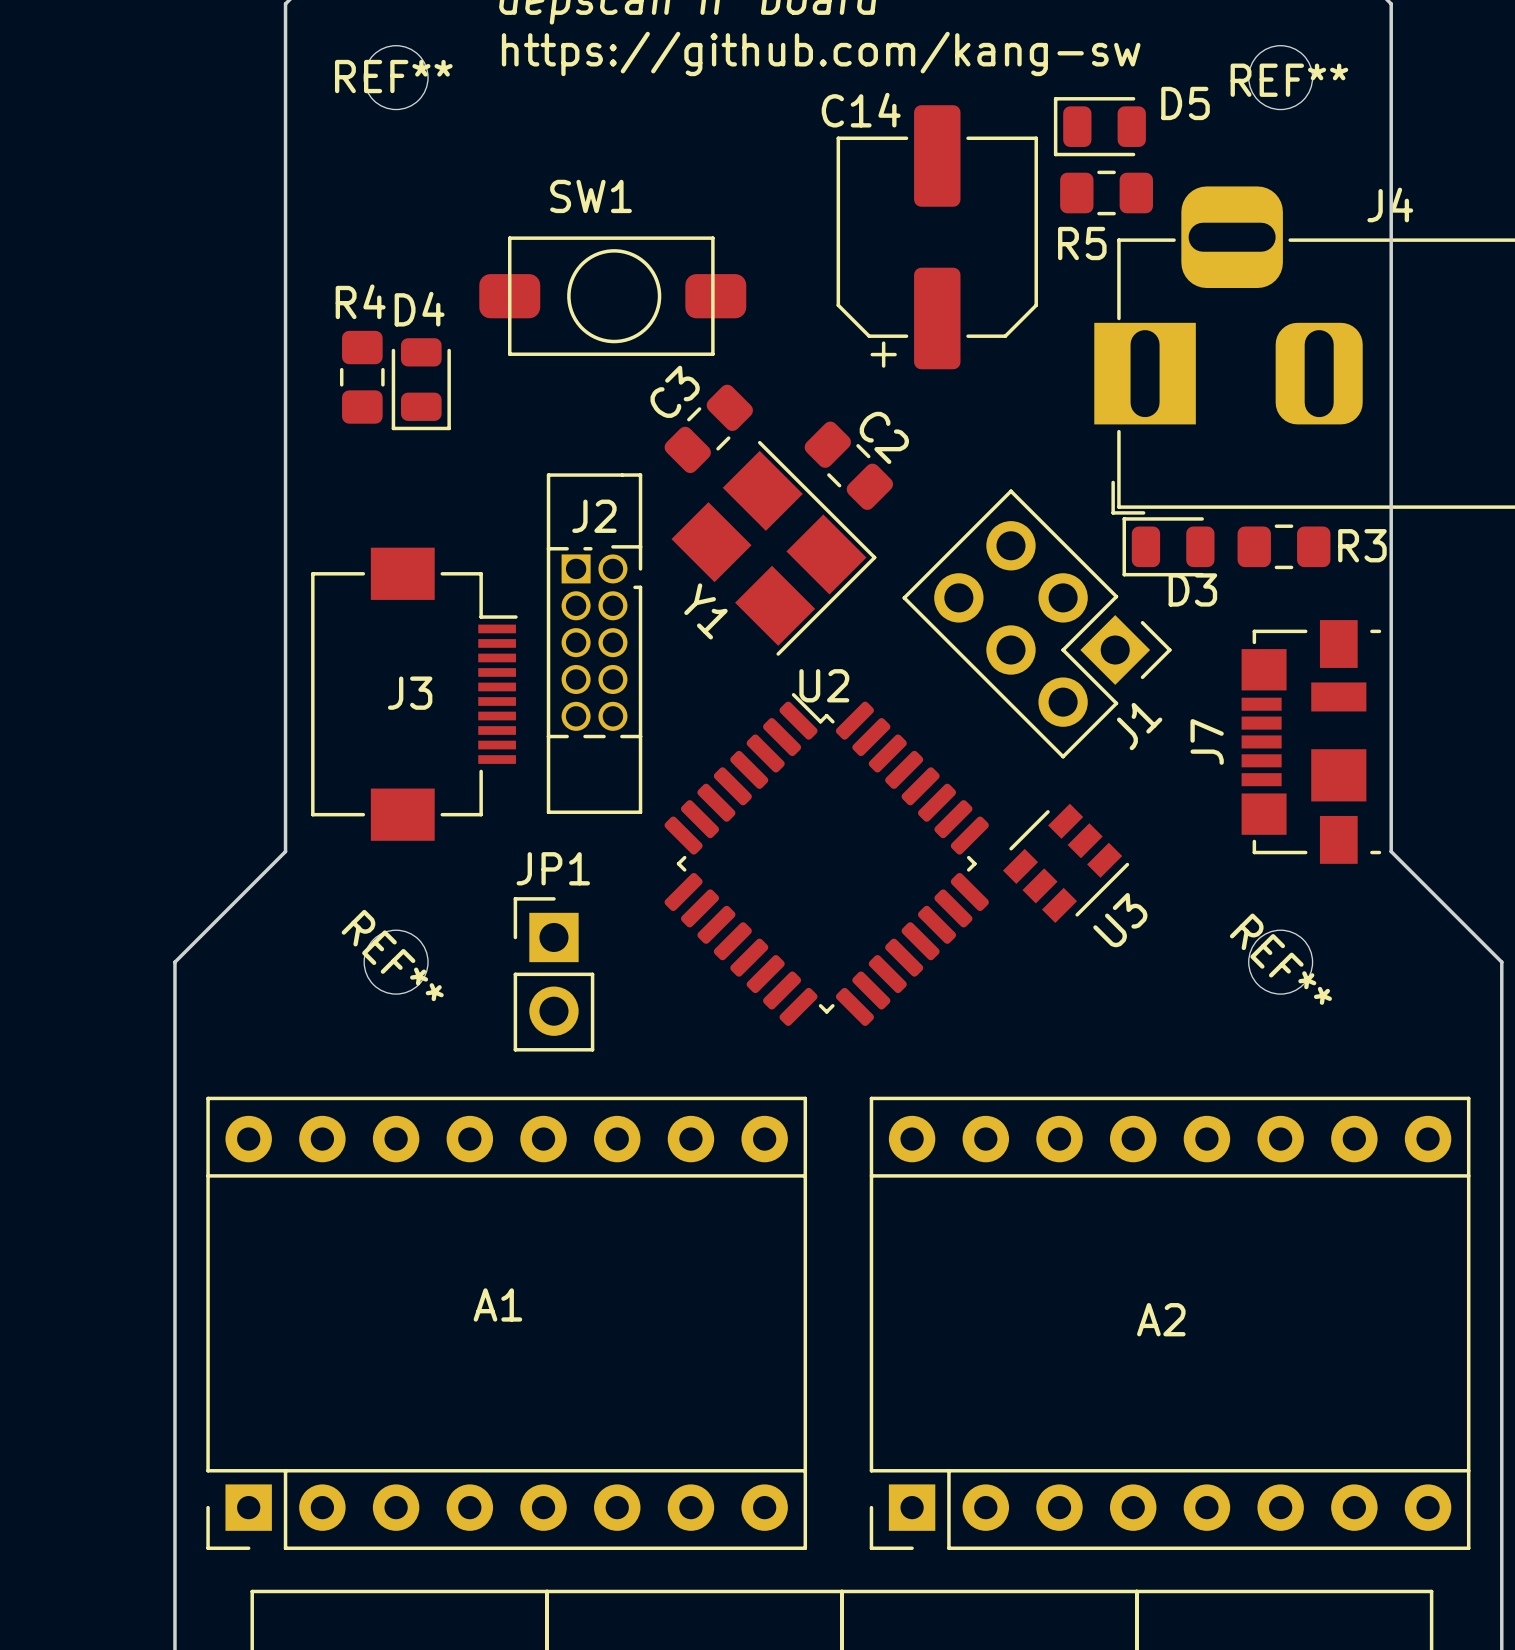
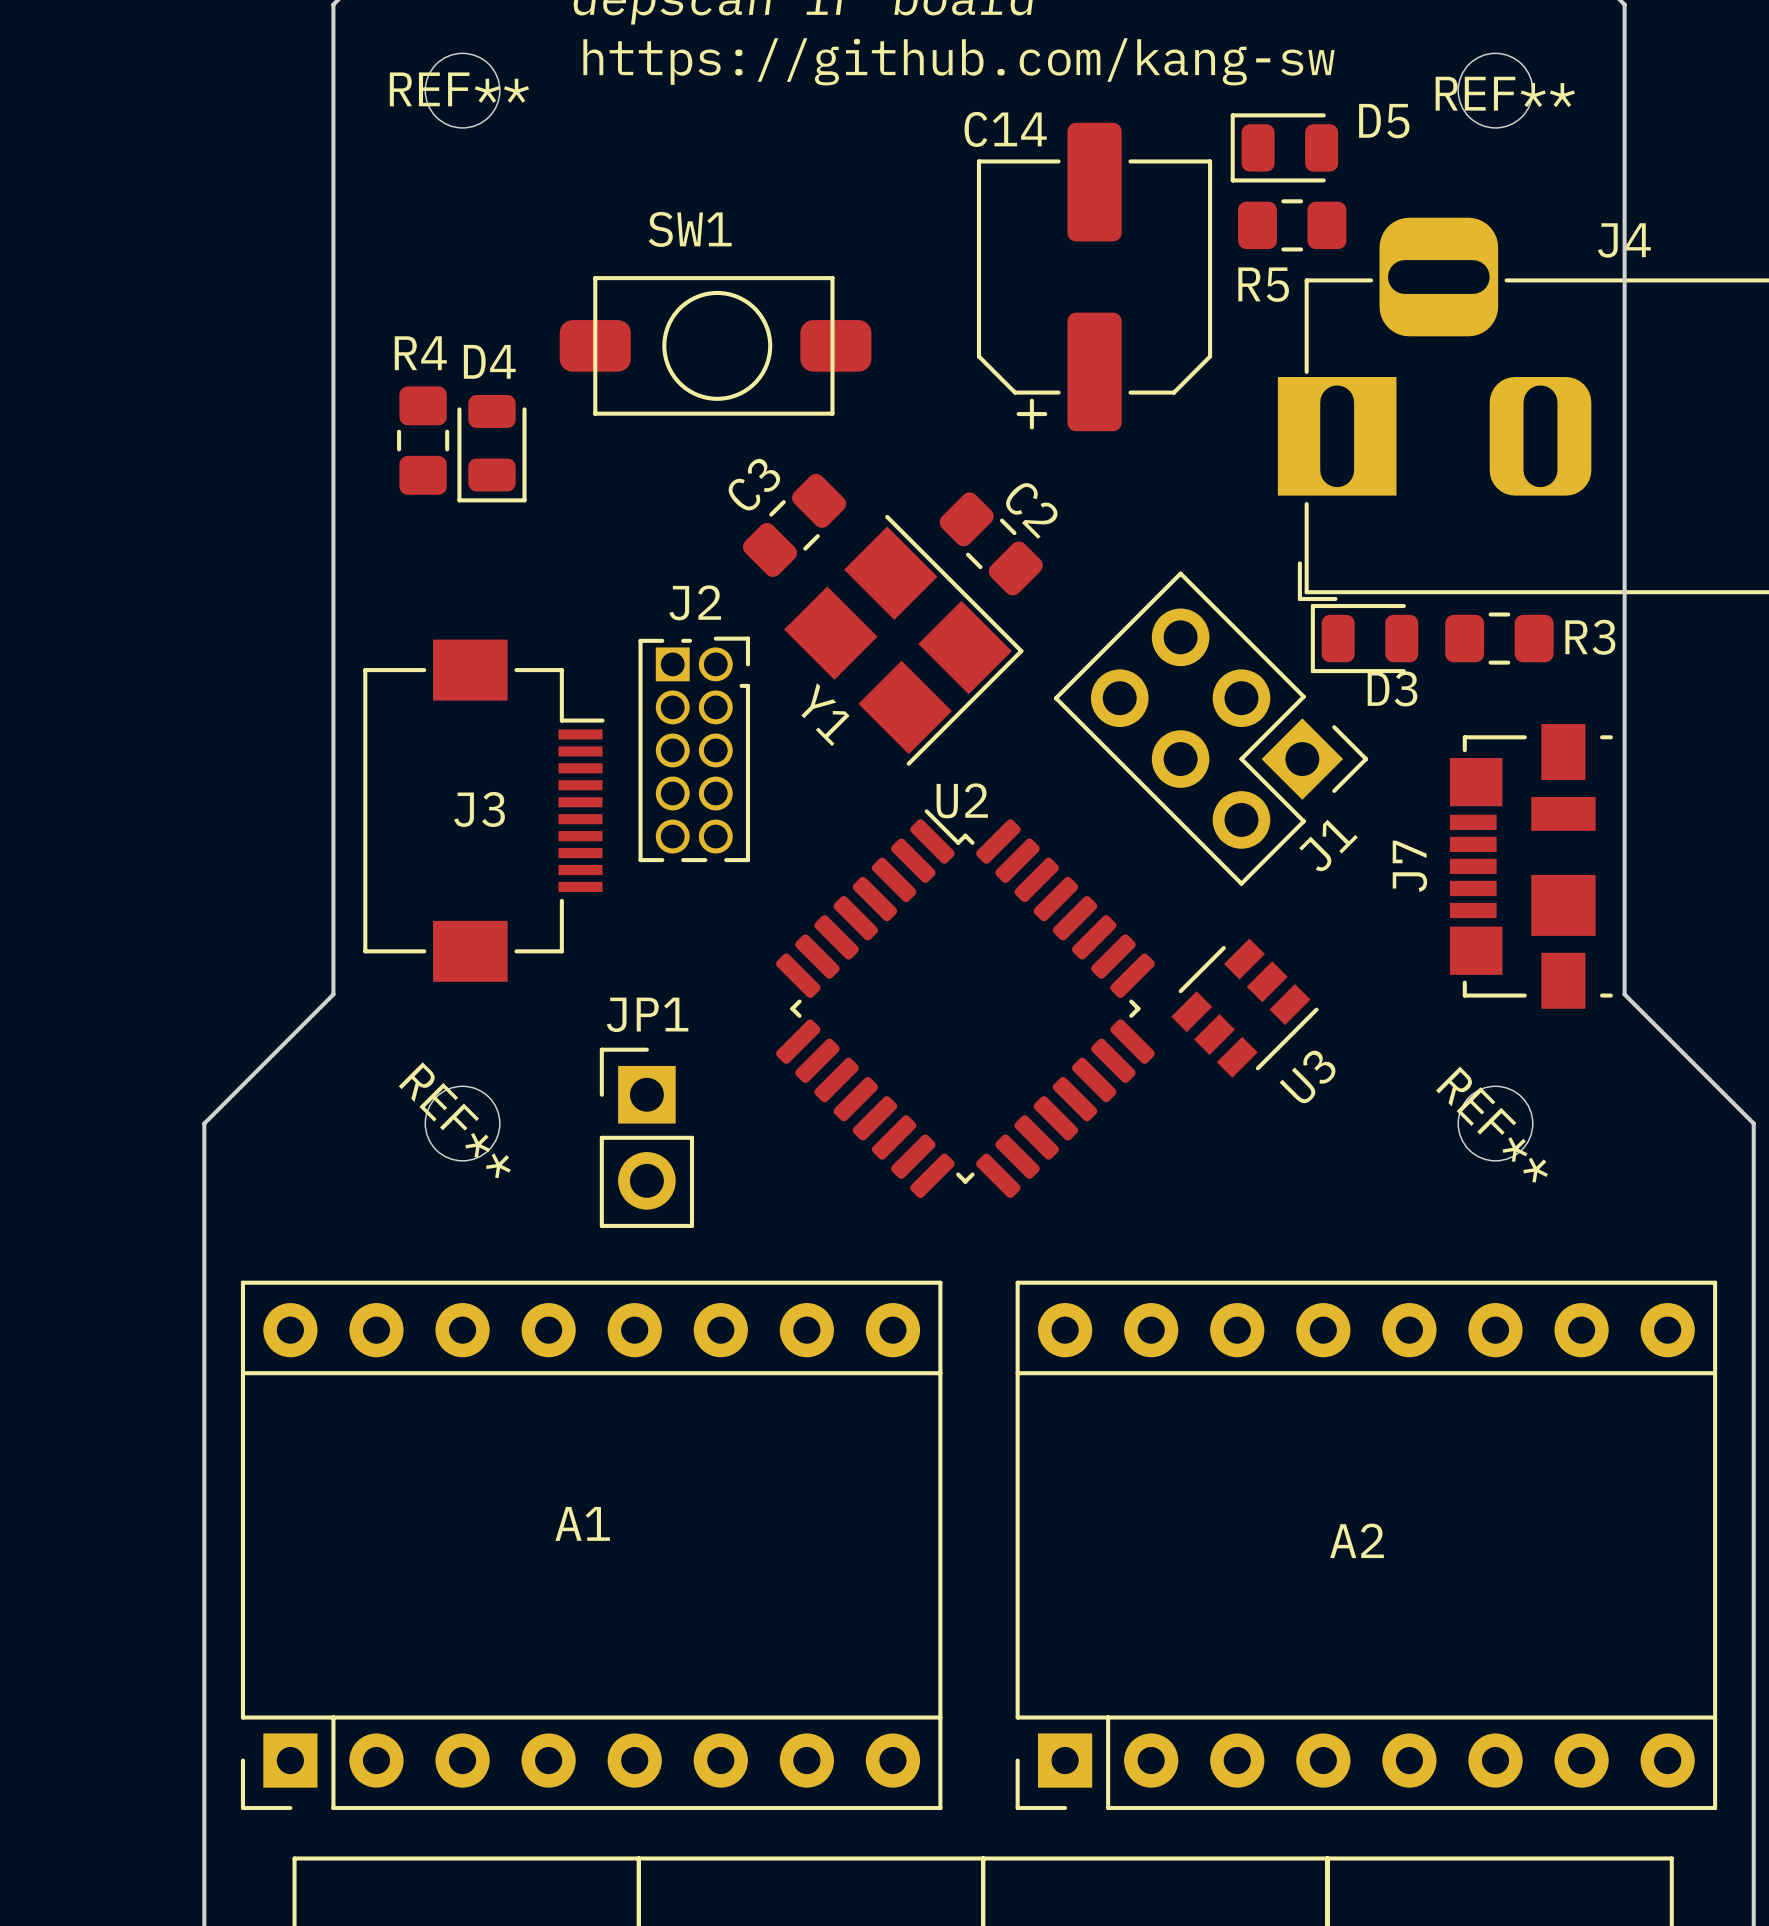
C3 position: (708, 428) -> (794, 525)
J2 footprint: [546, 473, 643, 814] -> [638, 636, 751, 863]

